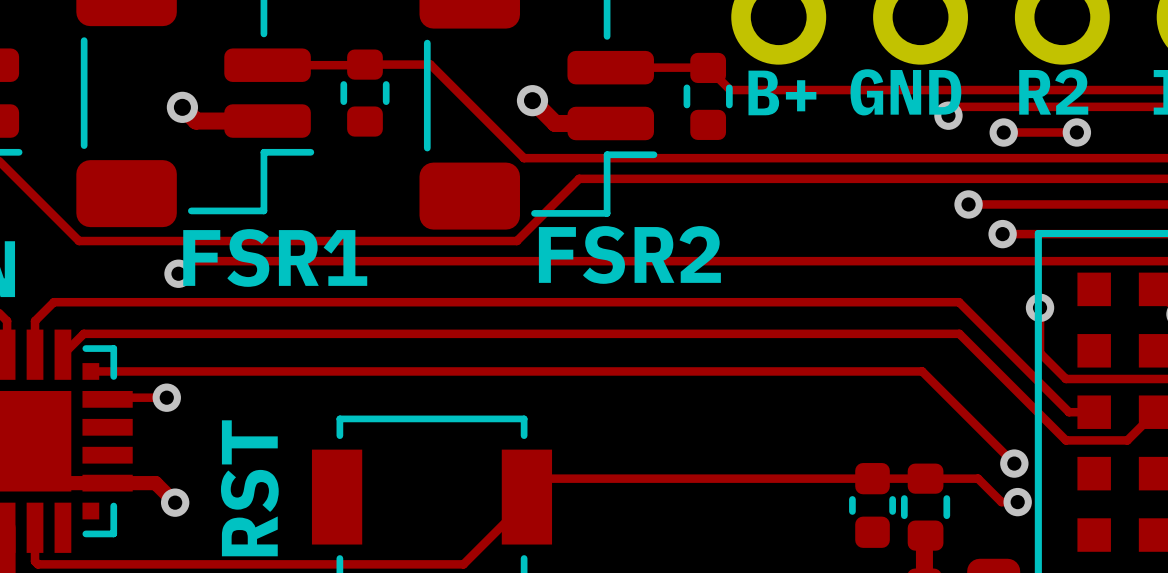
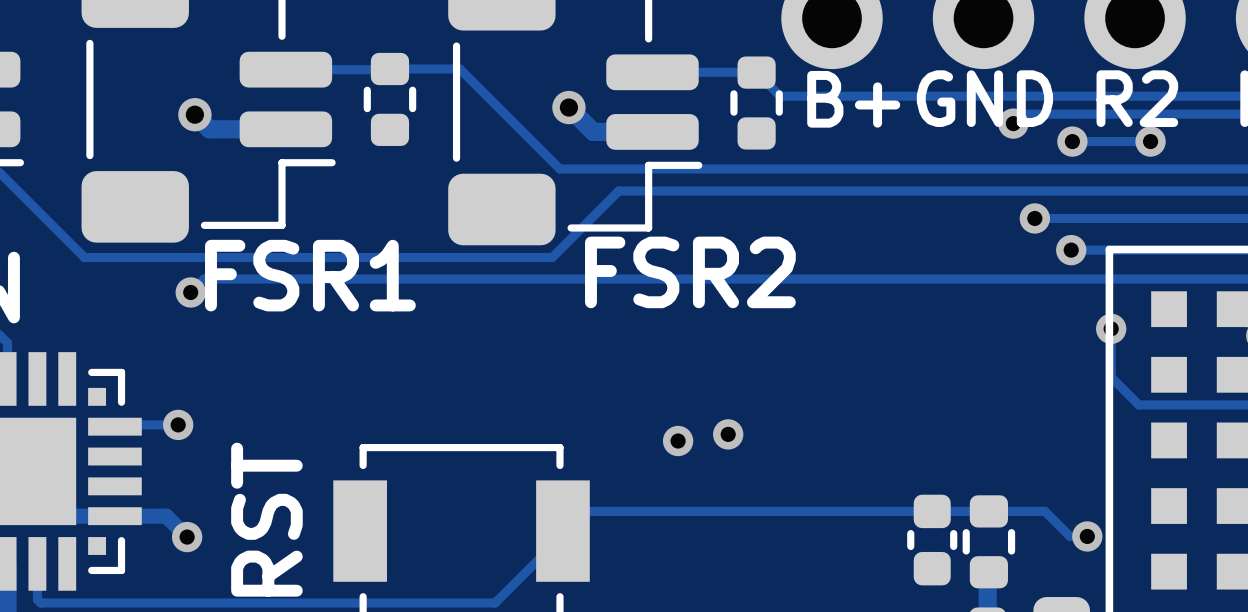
track: (35, 354) (35, 321) (53, 302) (959, 302) (1069, 412) (1094, 412) -> none
track: (62, 354) (83, 333) (959, 333) (1065, 440) (1127, 440) (1155, 412) -> none
track: (90, 371) (922, 371) (1014, 463) -> none
via: none -> (728, 434)
via: none -> (678, 441)
via: (1014, 463) -> none

